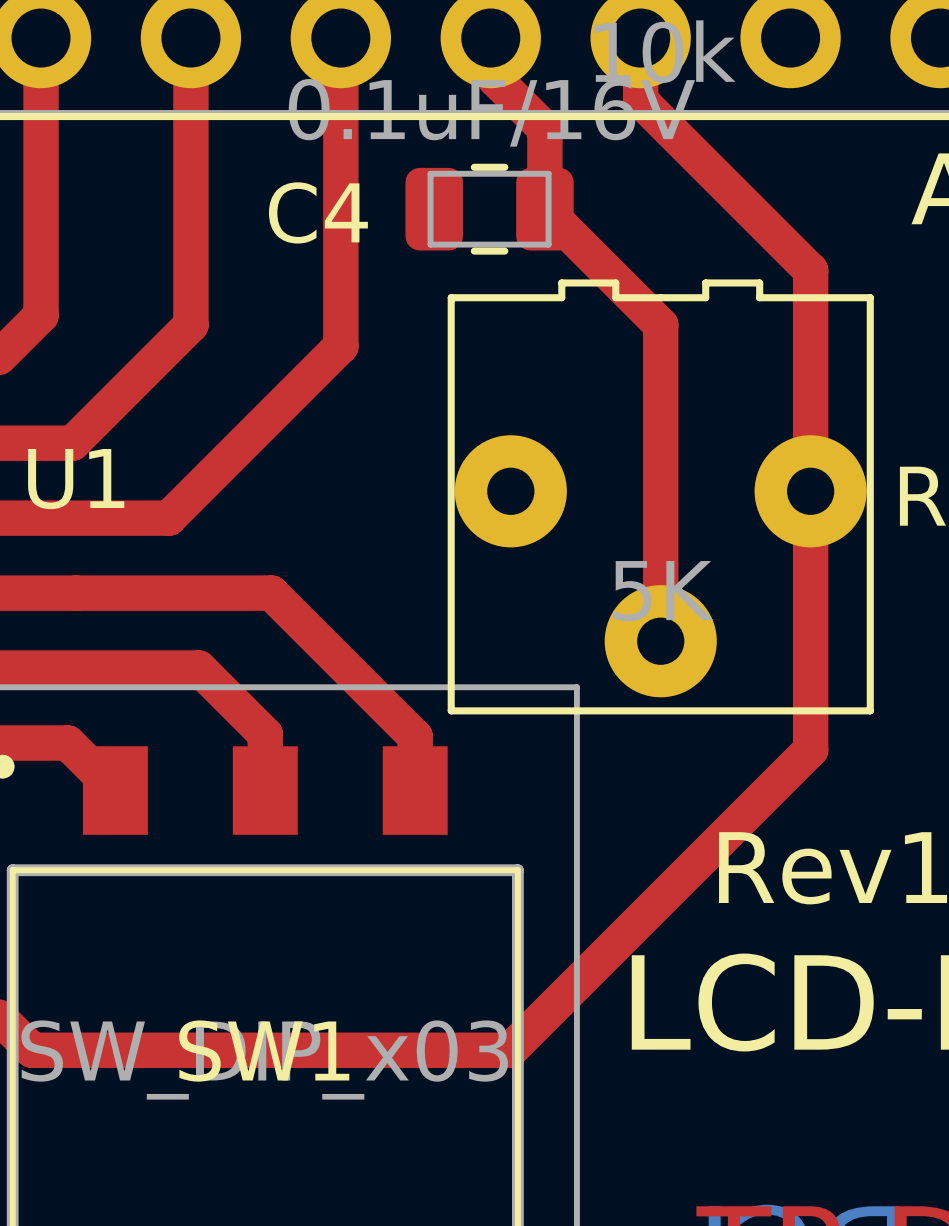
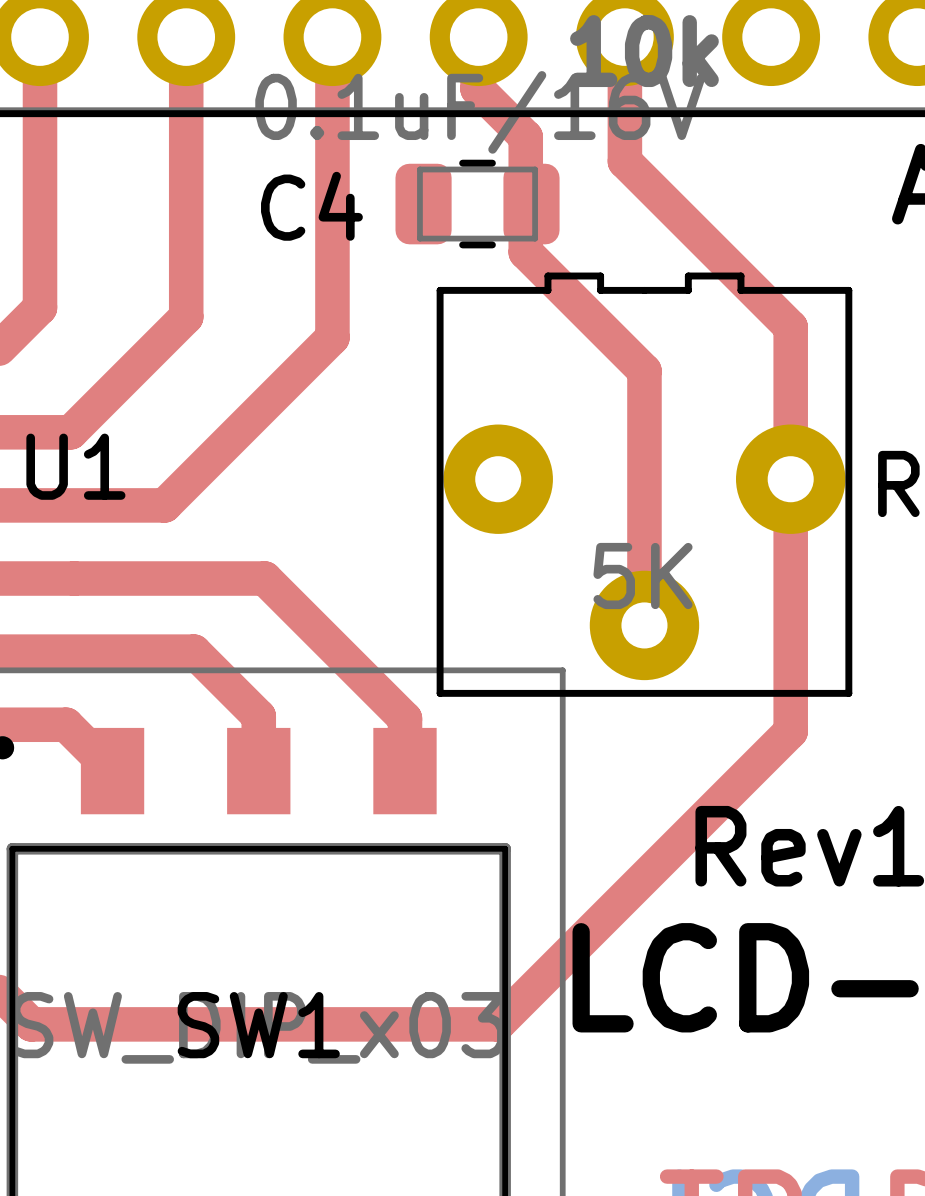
top track: (490, 38) (495, 42) (495, 79) (544, 128) (544, 209) (660, 325) (660, 380) -> (478, 37) (477, 88) (525, 137) (525, 252) (644, 370)
top track: (640, 100) (810, 270) (810, 335) -> (624, 98) (624, 161) (790, 327)

